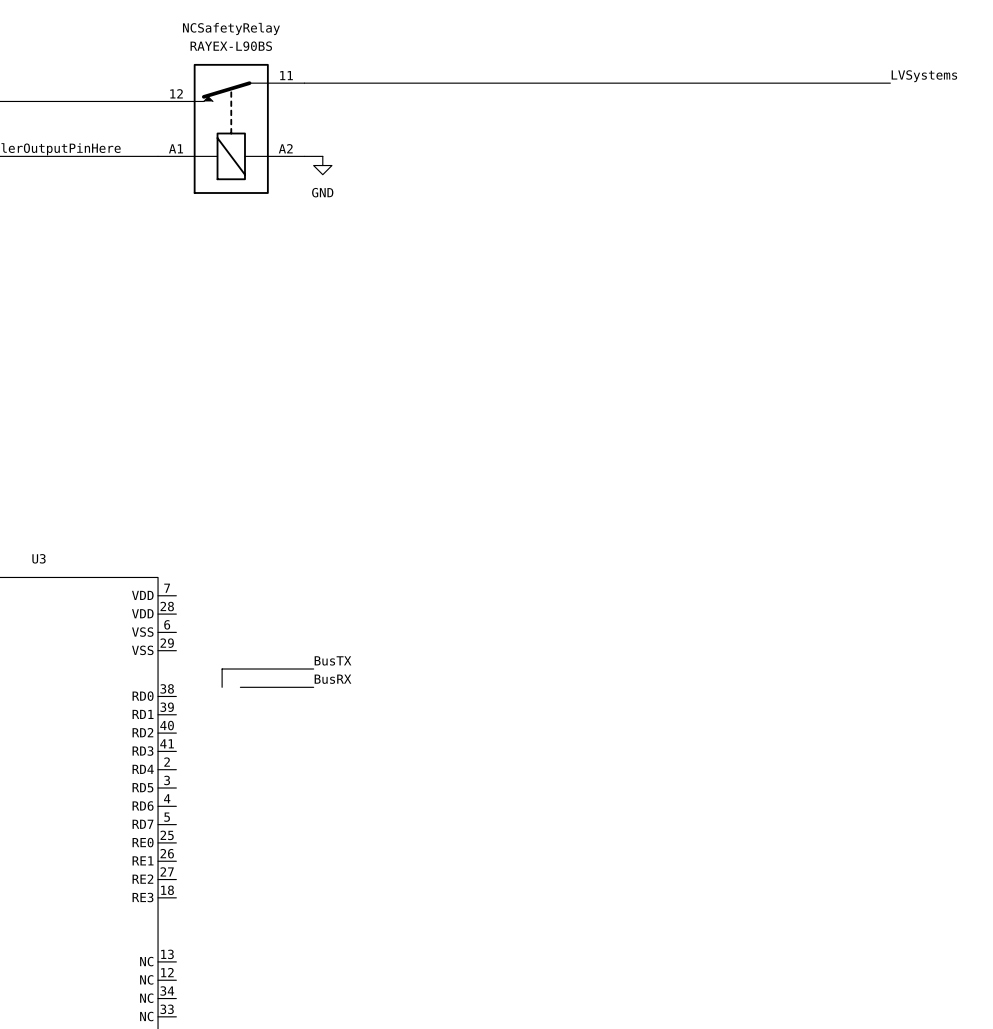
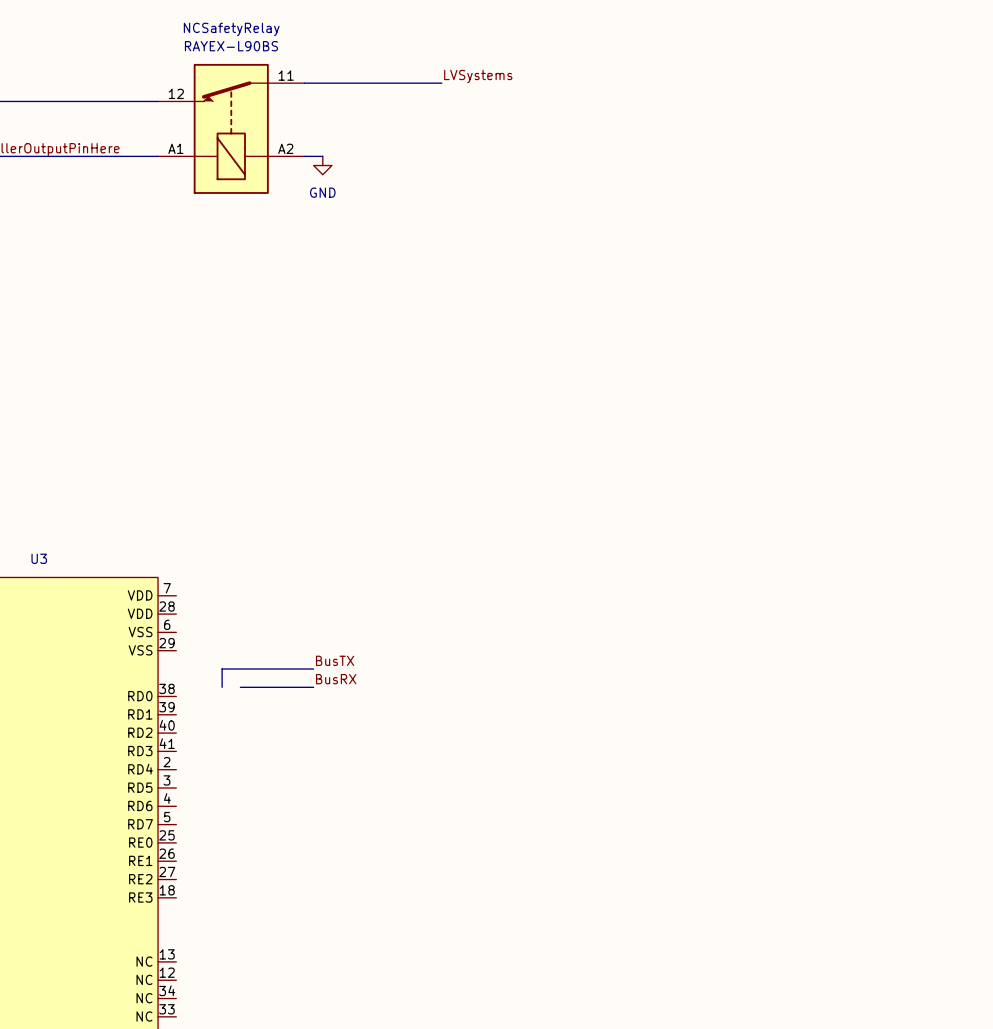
label: none -> LVSystems (478, 76)
label: LVSystems (924, 76) -> none
wire: (441, 83) (890, 83) -> none

